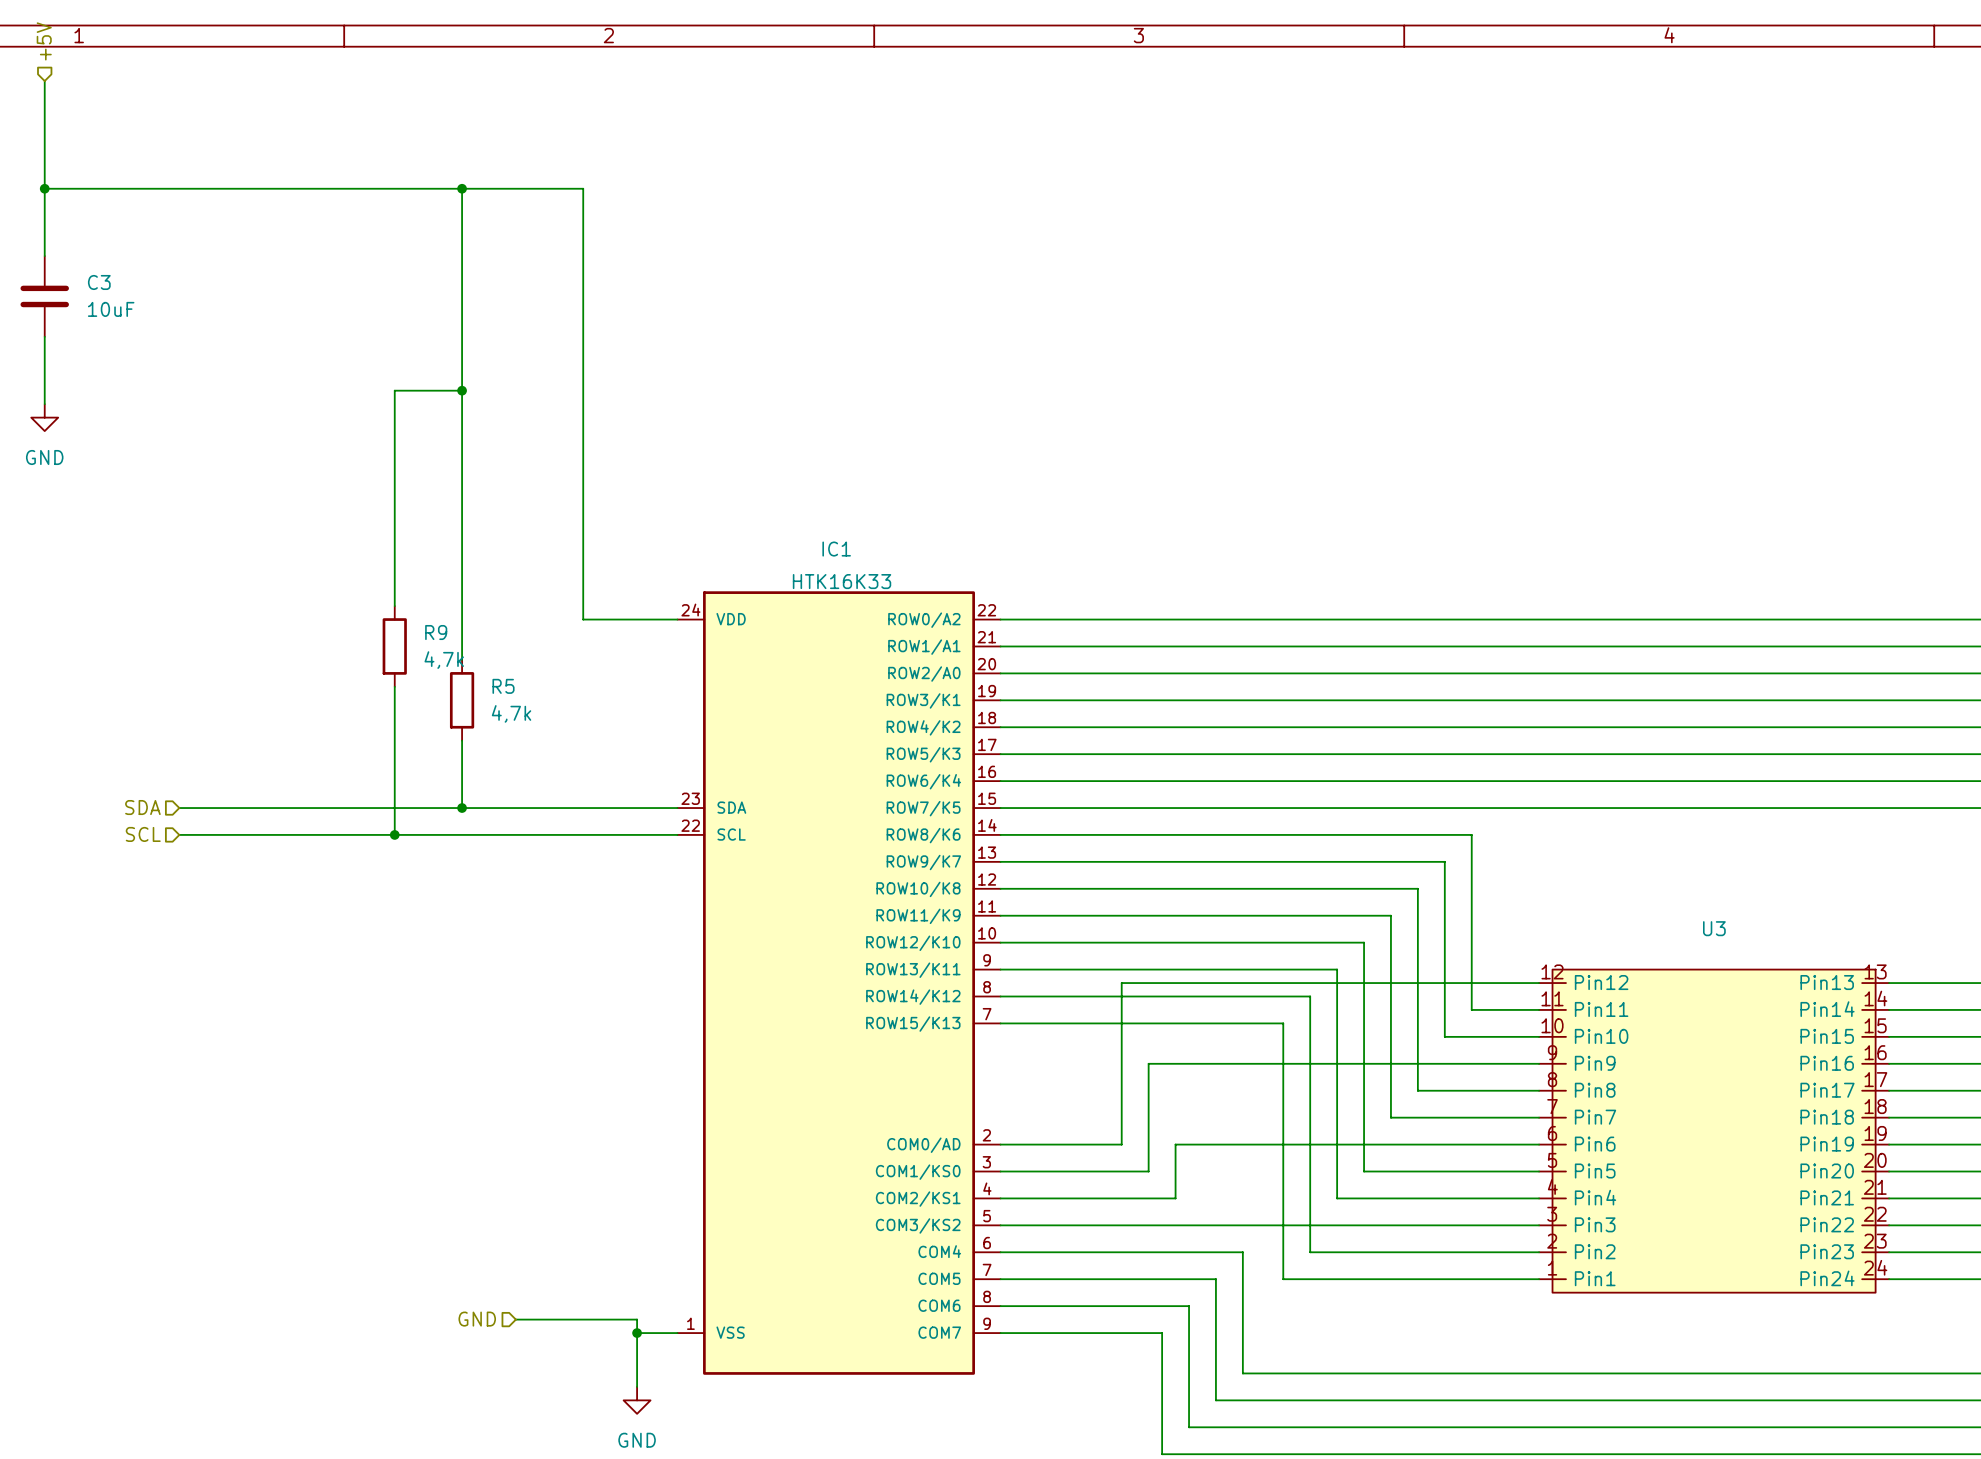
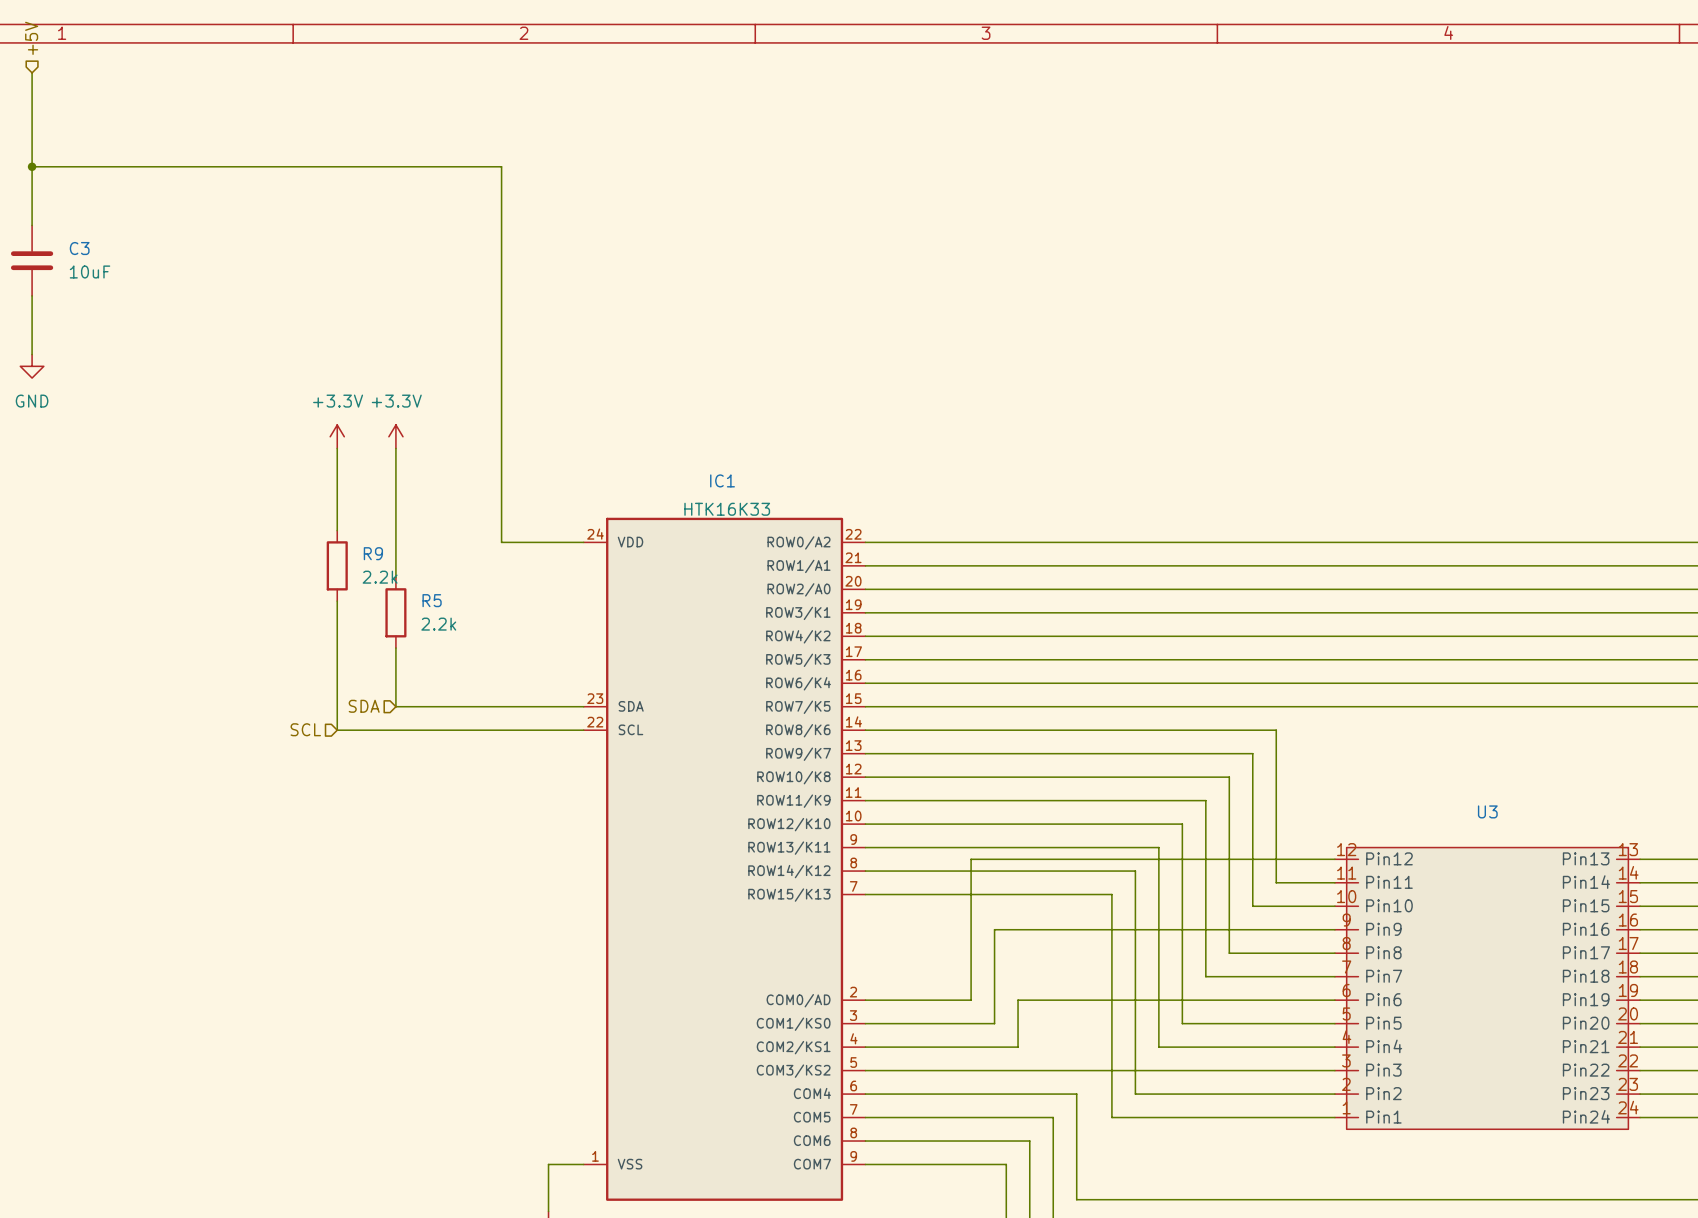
wire: (462, 188) (462, 511) -> none
junction: (462, 188) -> none
wire: (462, 390) (394, 390) (394, 511) -> none
junction: (462, 390) -> none
power symbol: none -> +3.3V (337, 436)
power symbol: none -> +3.3V (395, 436)
R9 value: 4,7k (444, 660) -> 2.2k (380, 577)
R5 value: 4,7k (511, 713) -> 2.2k (438, 624)
hierarchical label: SDA (142, 807) -> none
hierarchical label: none -> SDA (364, 706)
wire: (179, 808) (462, 808) -> none
junction: (462, 808) -> none
hierarchical label position: SCL (143, 834) -> SCL (305, 729)
wire: (179, 834) (394, 834) -> none
junction: (394, 834) -> none
hierarchical label: GND (477, 1319) -> none
wire: (515, 1319) (637, 1319) (637, 1333) -> none
junction: (637, 1333) -> none

